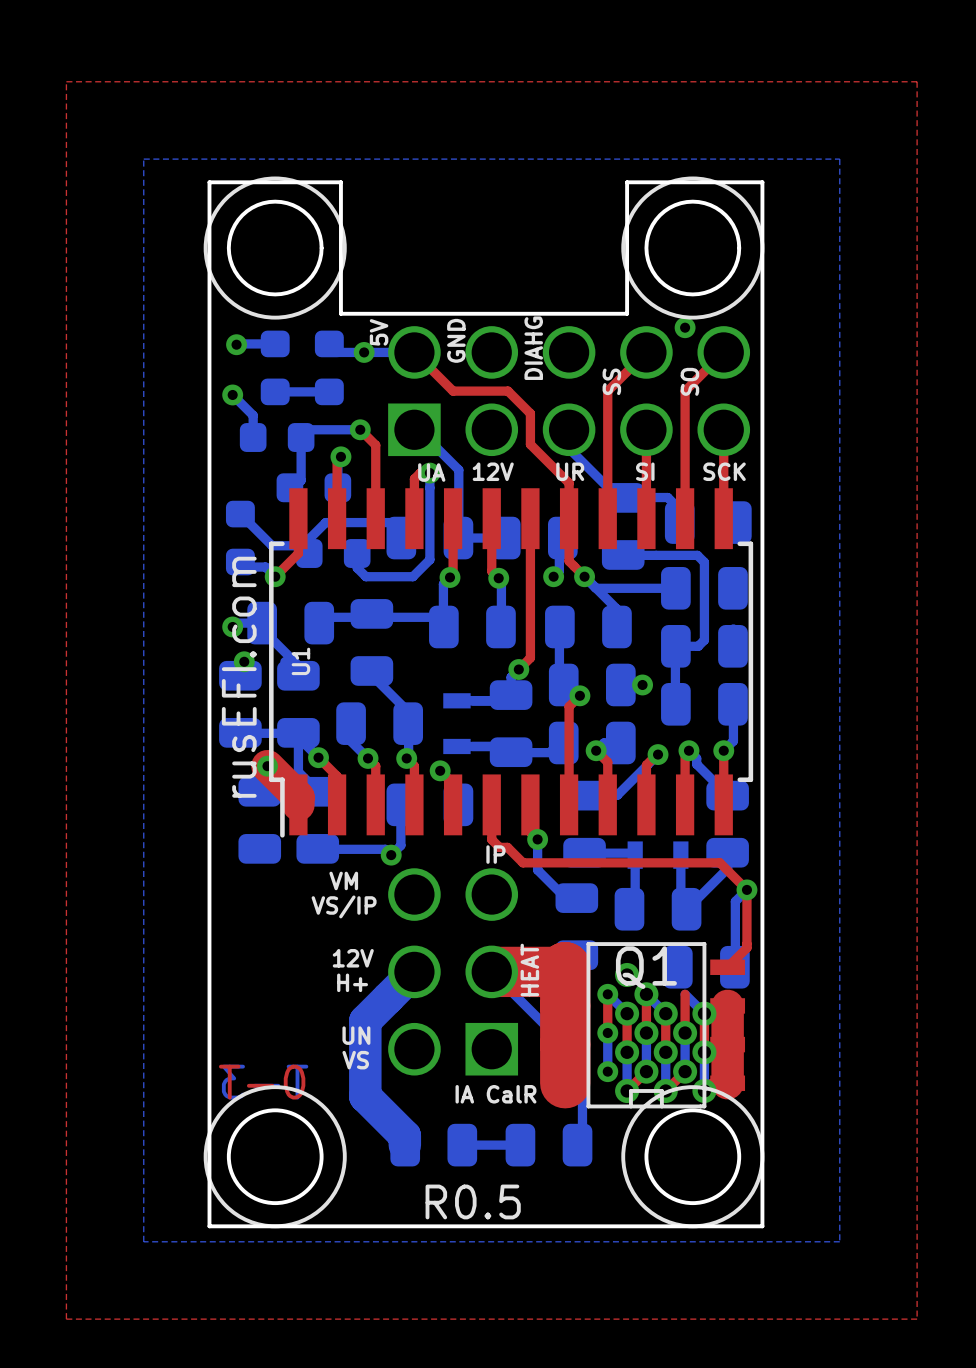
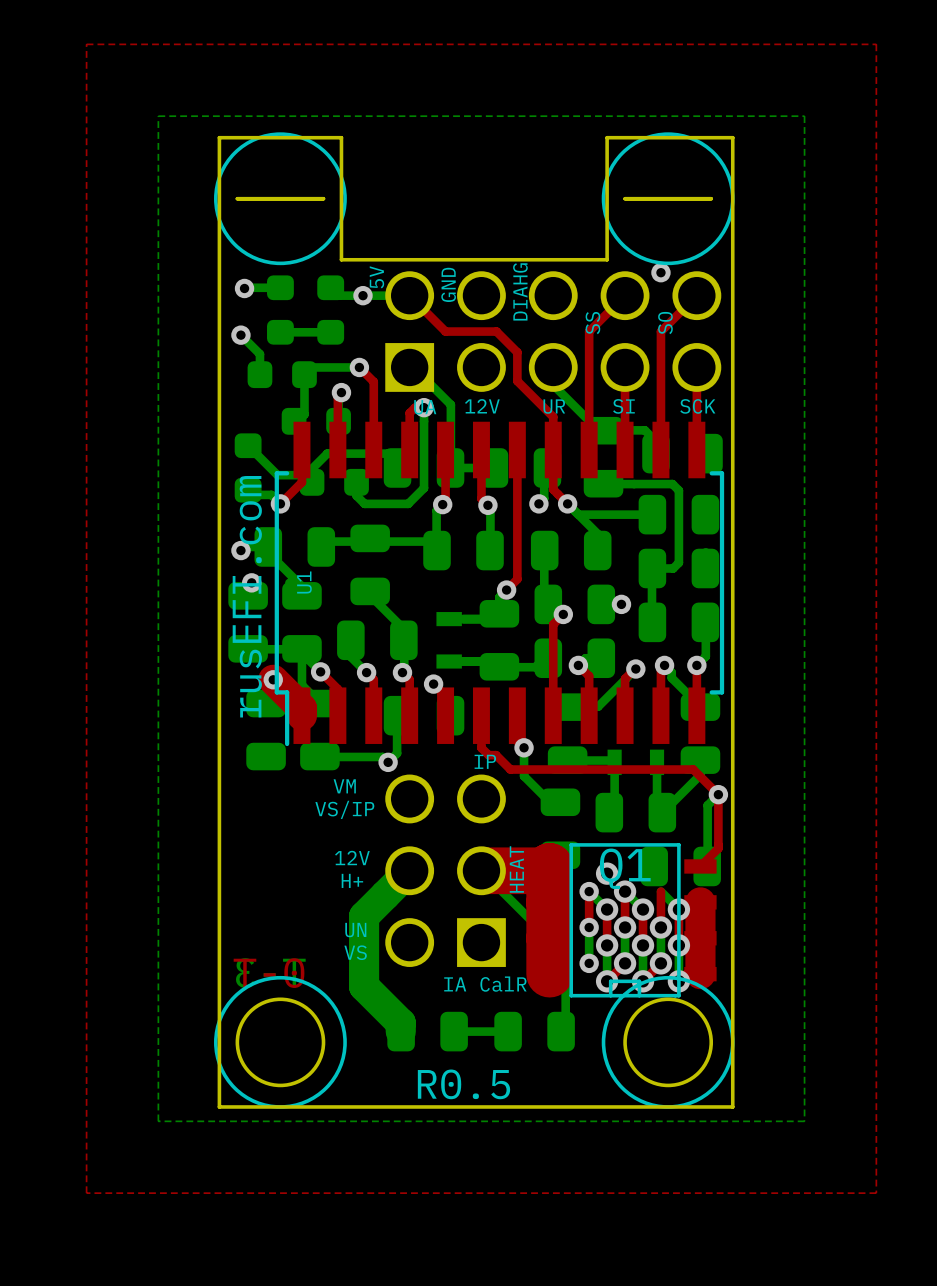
board edge: (321, 248) (318, 265) (308, 280) (292, 290) (275, 294) (257, 290) (242, 280) (232, 265) (228, 248) (232, 230) (242, 215) (257, 205) (275, 201) (292, 205) (308, 215) (318, 230) (321, 248) -> (323, 198) (237, 198) (323, 198)
board edge: (739, 248) (735, 265) (725, 280) (710, 290) (692, 294) (675, 290) (660, 280) (649, 265) (646, 248) (649, 230) (660, 215) (675, 205) (692, 201) (710, 205) (725, 215) (735, 230) (739, 248) -> (711, 198) (625, 198) (711, 198)

